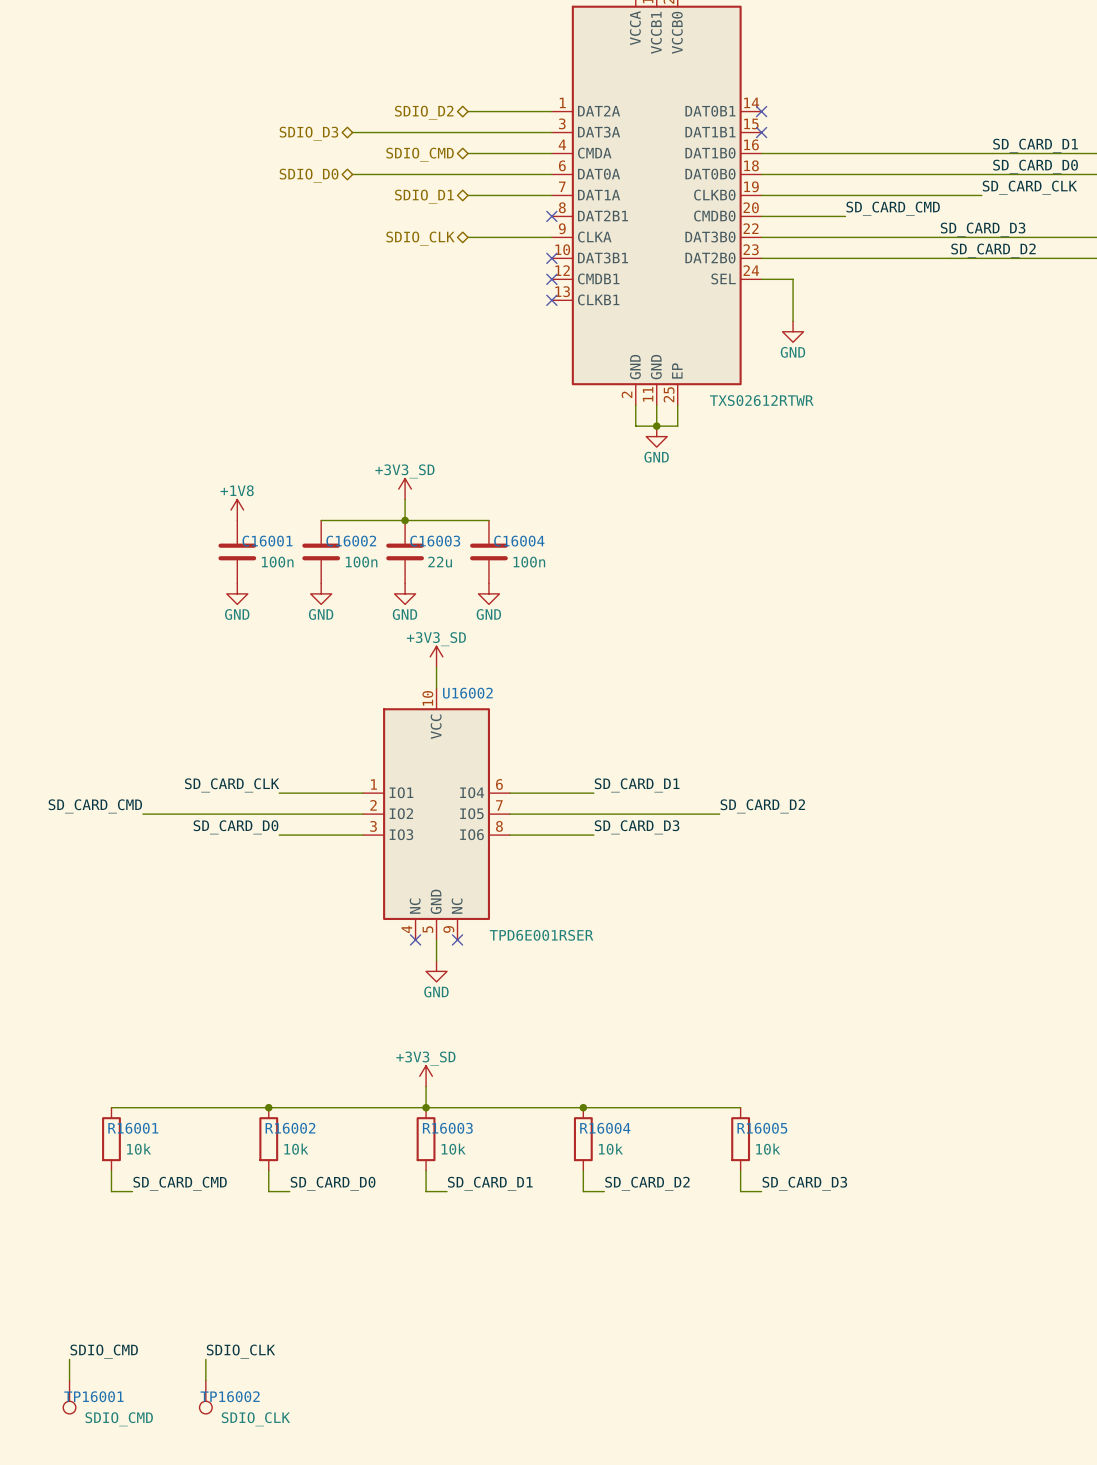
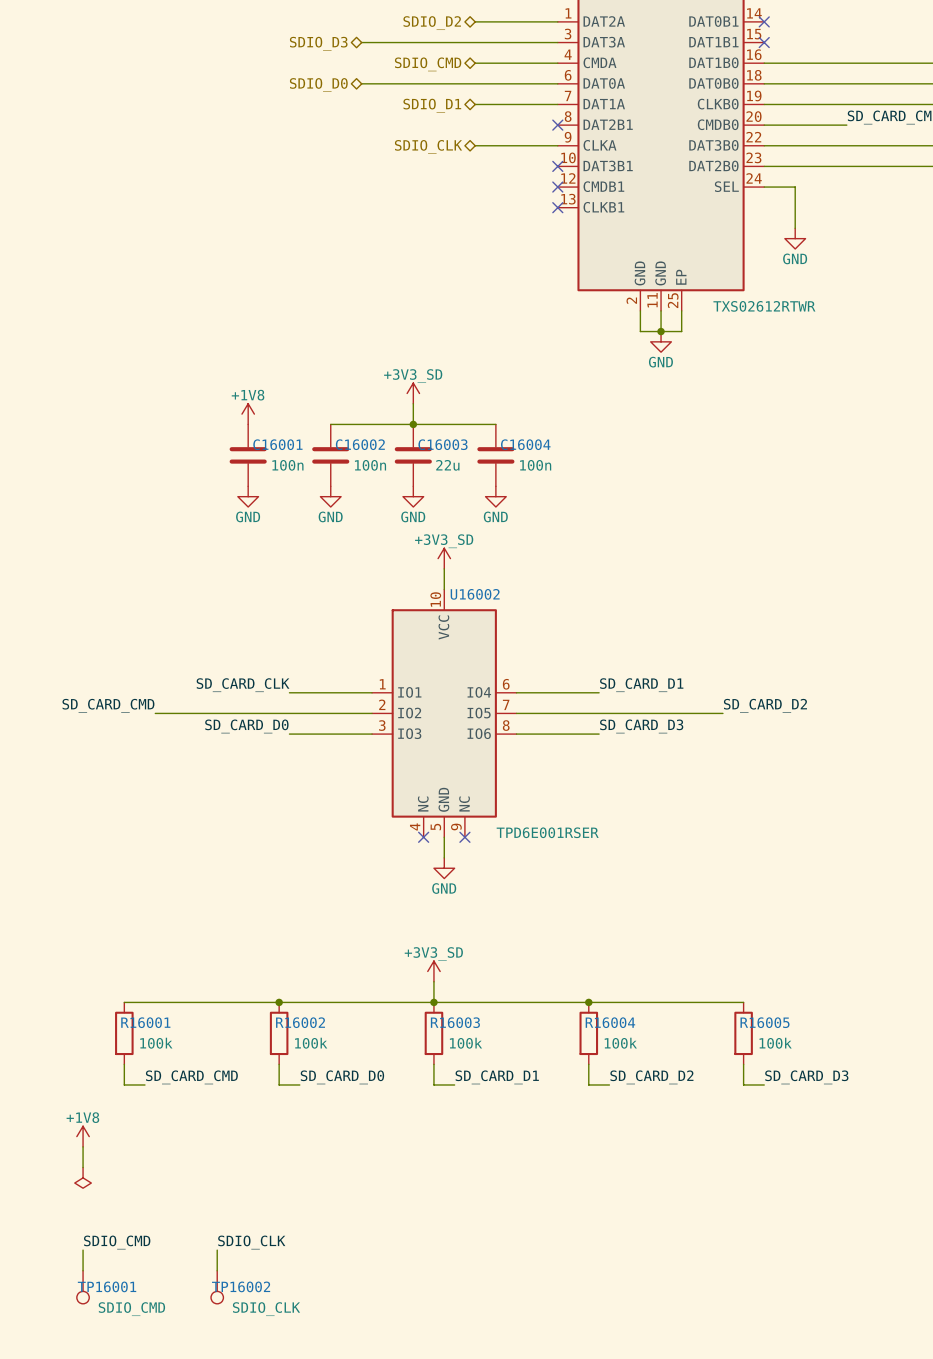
R16001 value: 10k (139, 1149) -> 100k (156, 1043)
R16002 value: 10k (296, 1149) -> 100k (311, 1043)
R16003 value: 10k (453, 1149) -> 100k (465, 1043)
R16004 value: 10k (610, 1149) -> 100k (620, 1043)
R16005 value: 10k (768, 1149) -> 100k (775, 1043)
power symbol: none -> +1V8 (83, 1136)
wire: none -> (83, 1146) (83, 1167)
power symbol: none -> (83, 1177)

